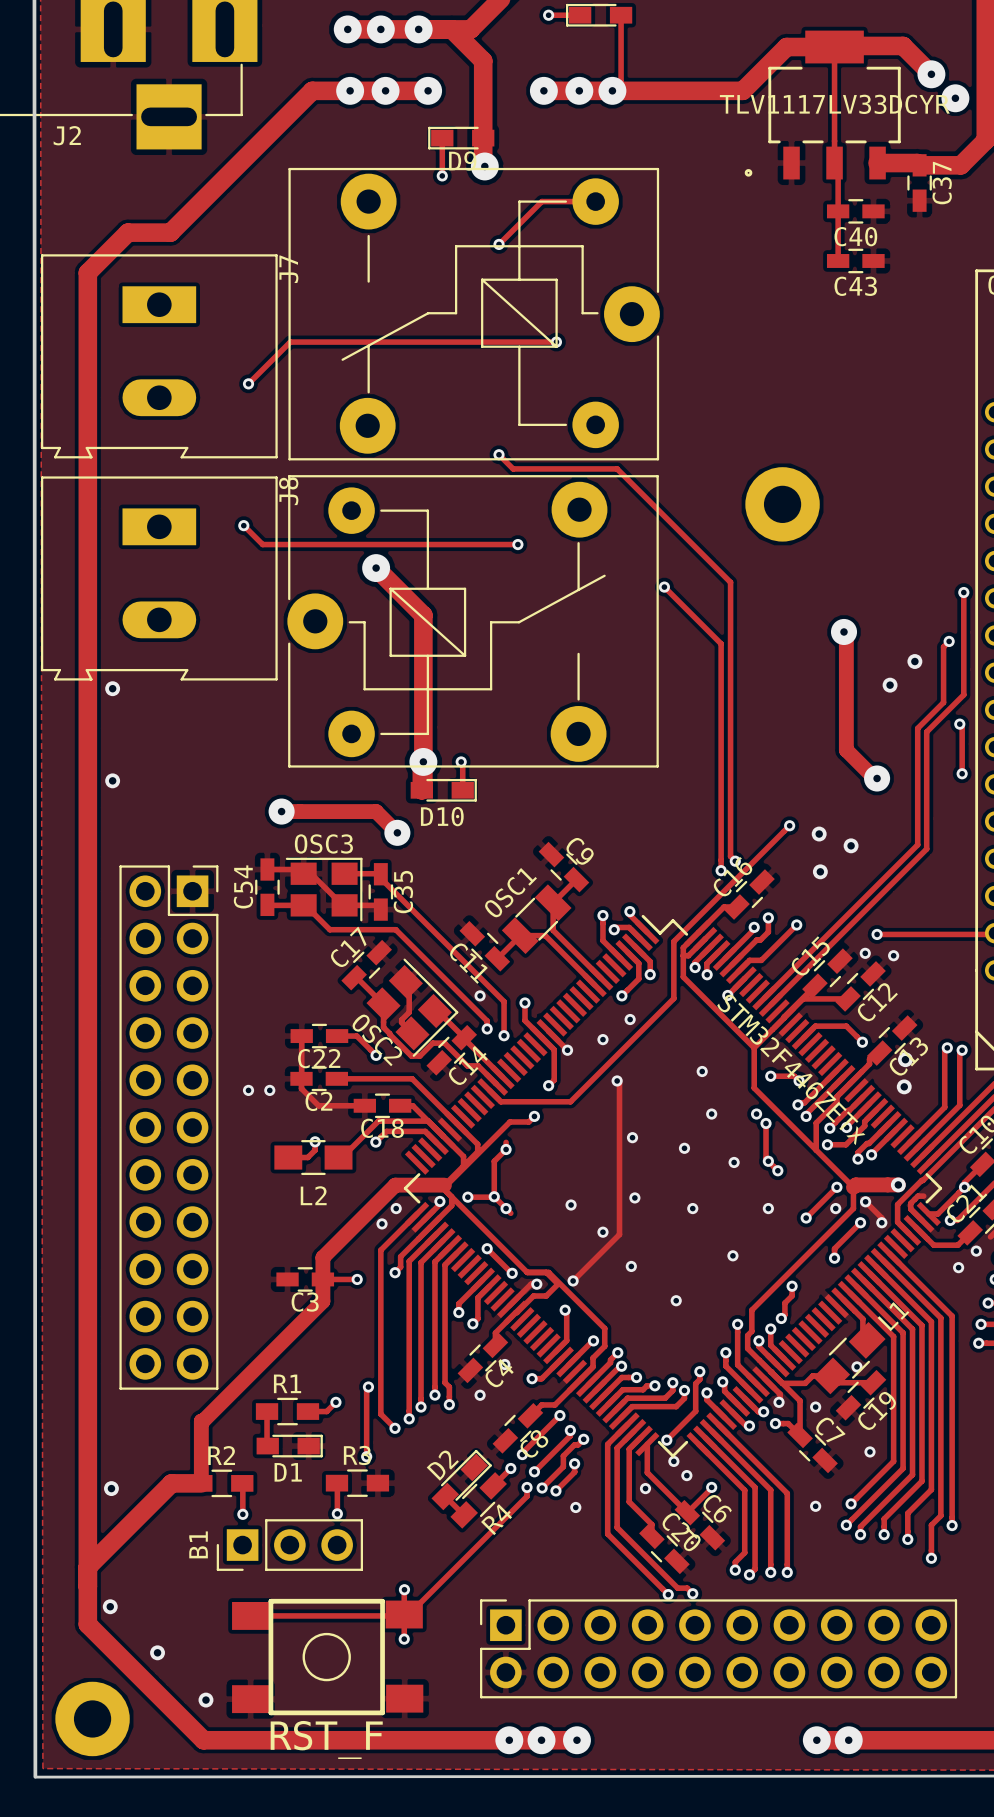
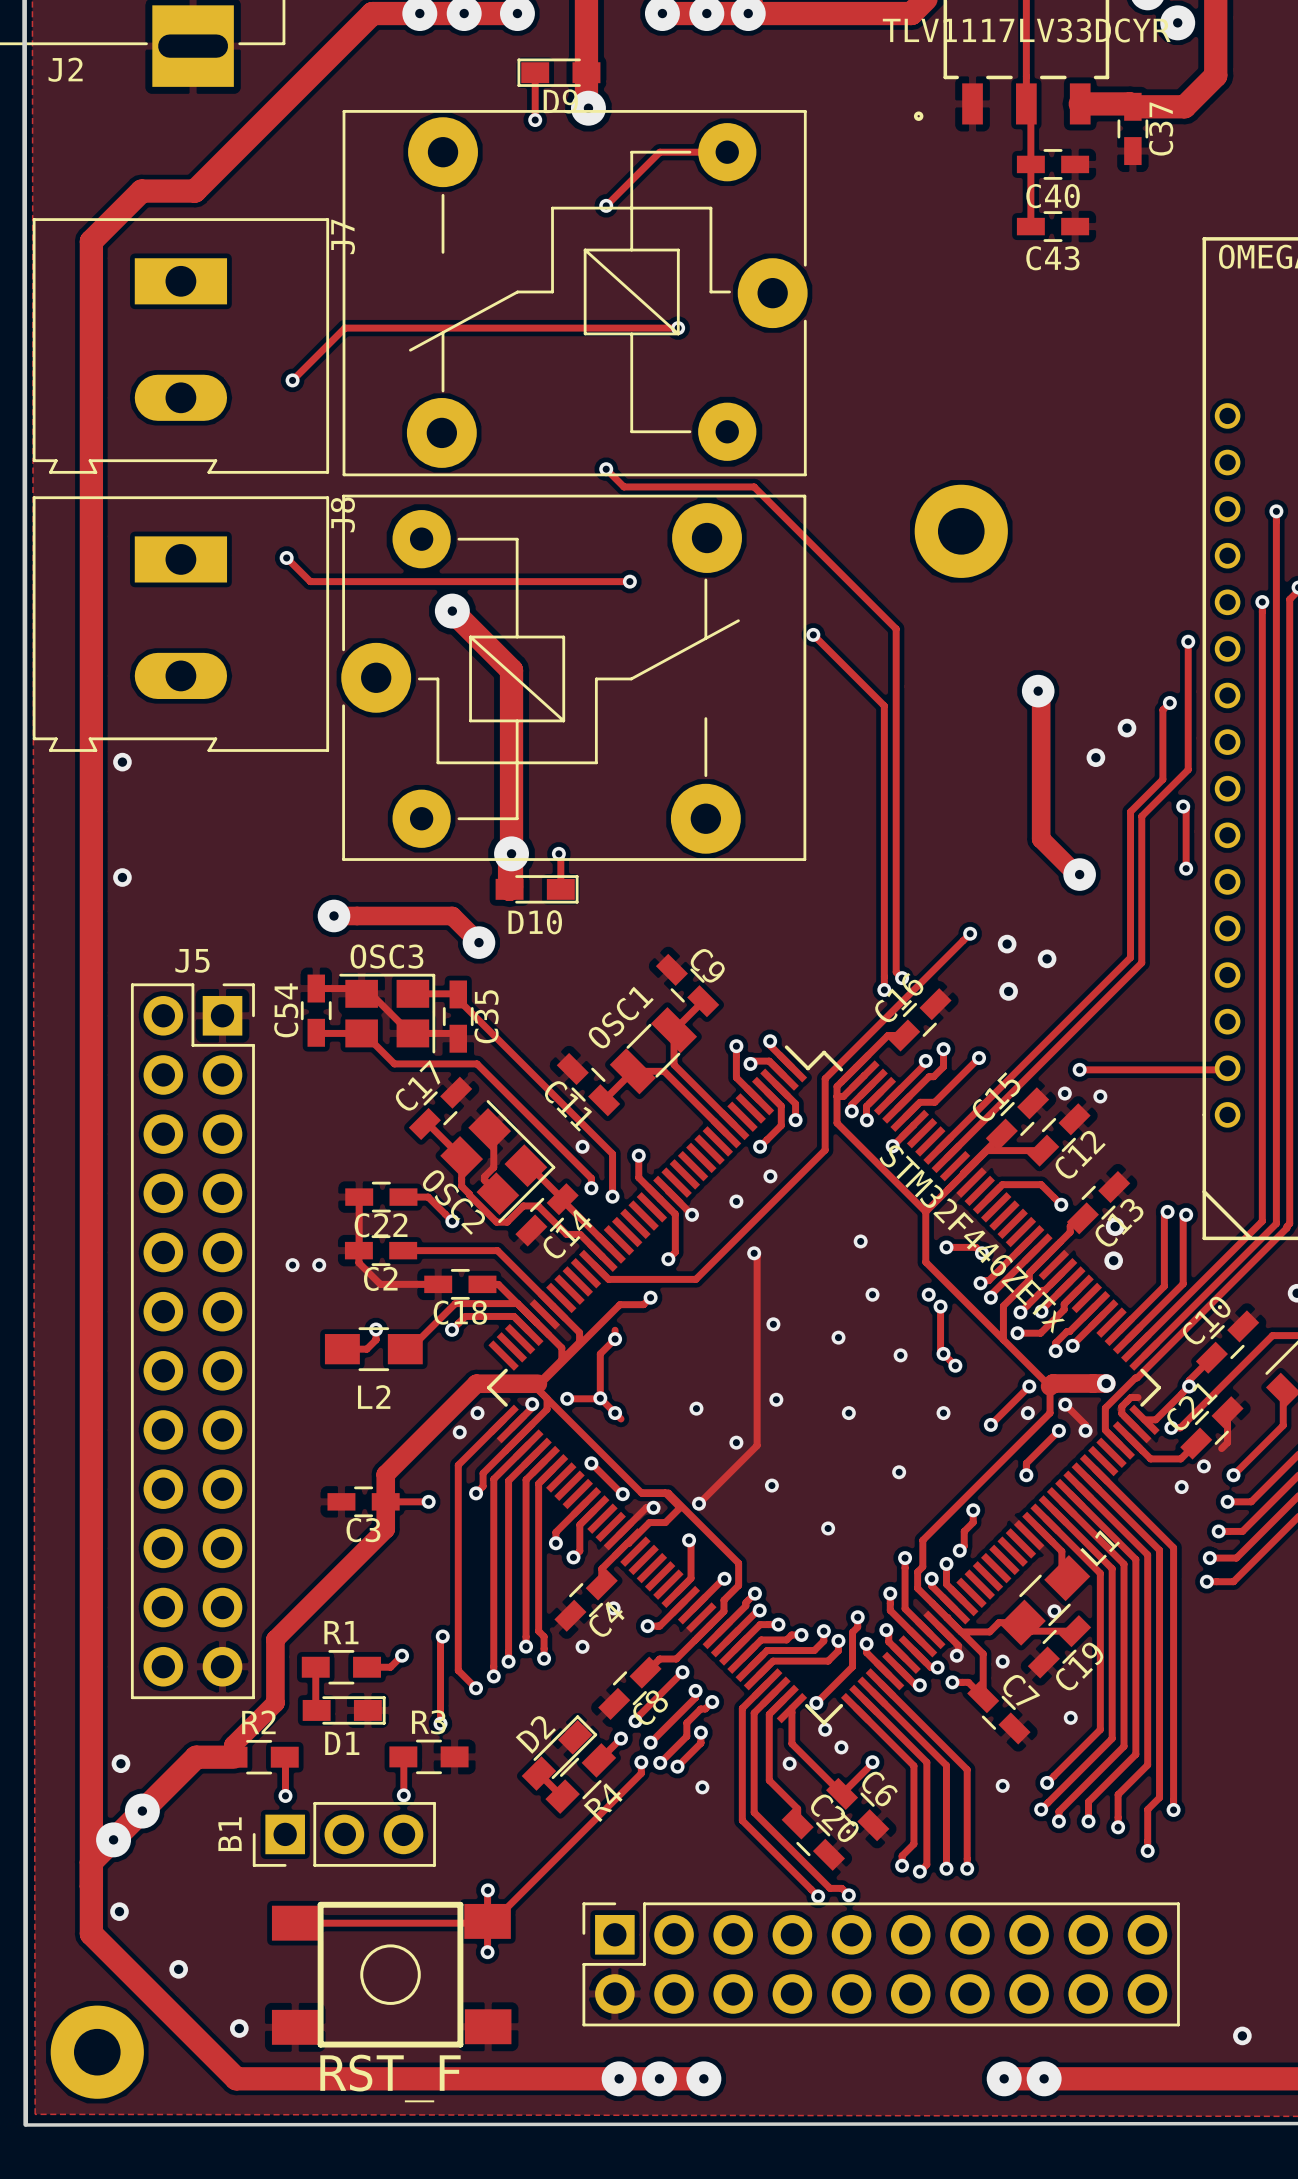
part: (168, 1127) -> none
J5: none -> (192, 1341)
track: (234, 1389) (201, 1421) (201, 1473) -> (275, 1639) (275, 1703) (233, 1744)
via: none -> (142, 1811)
via: none -> (113, 1839)

